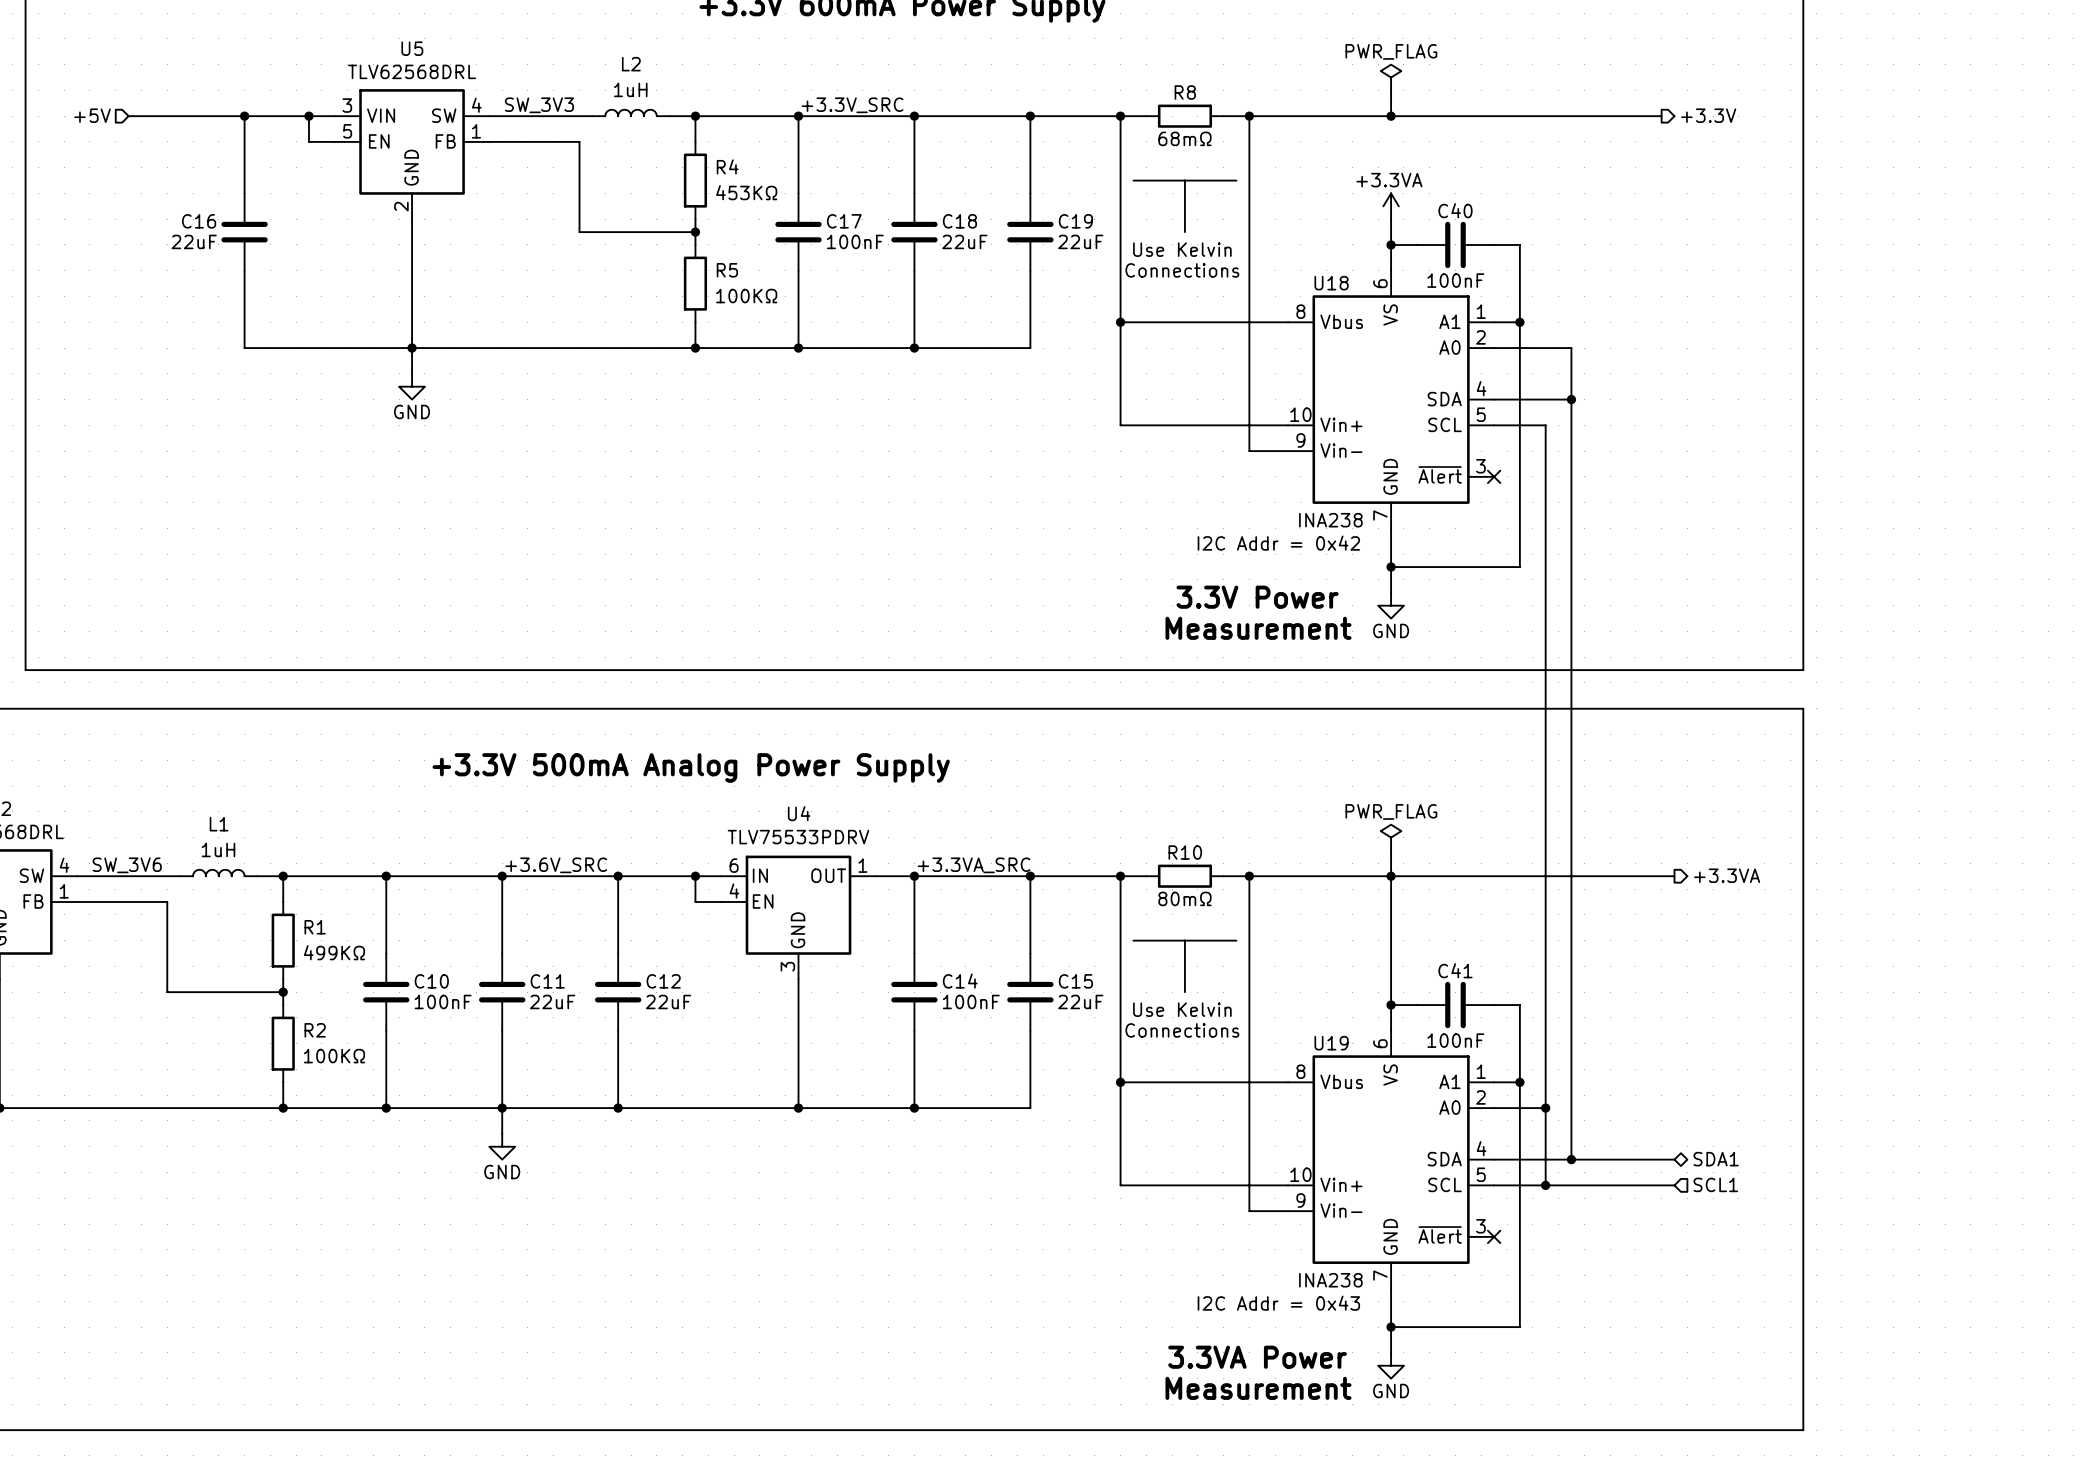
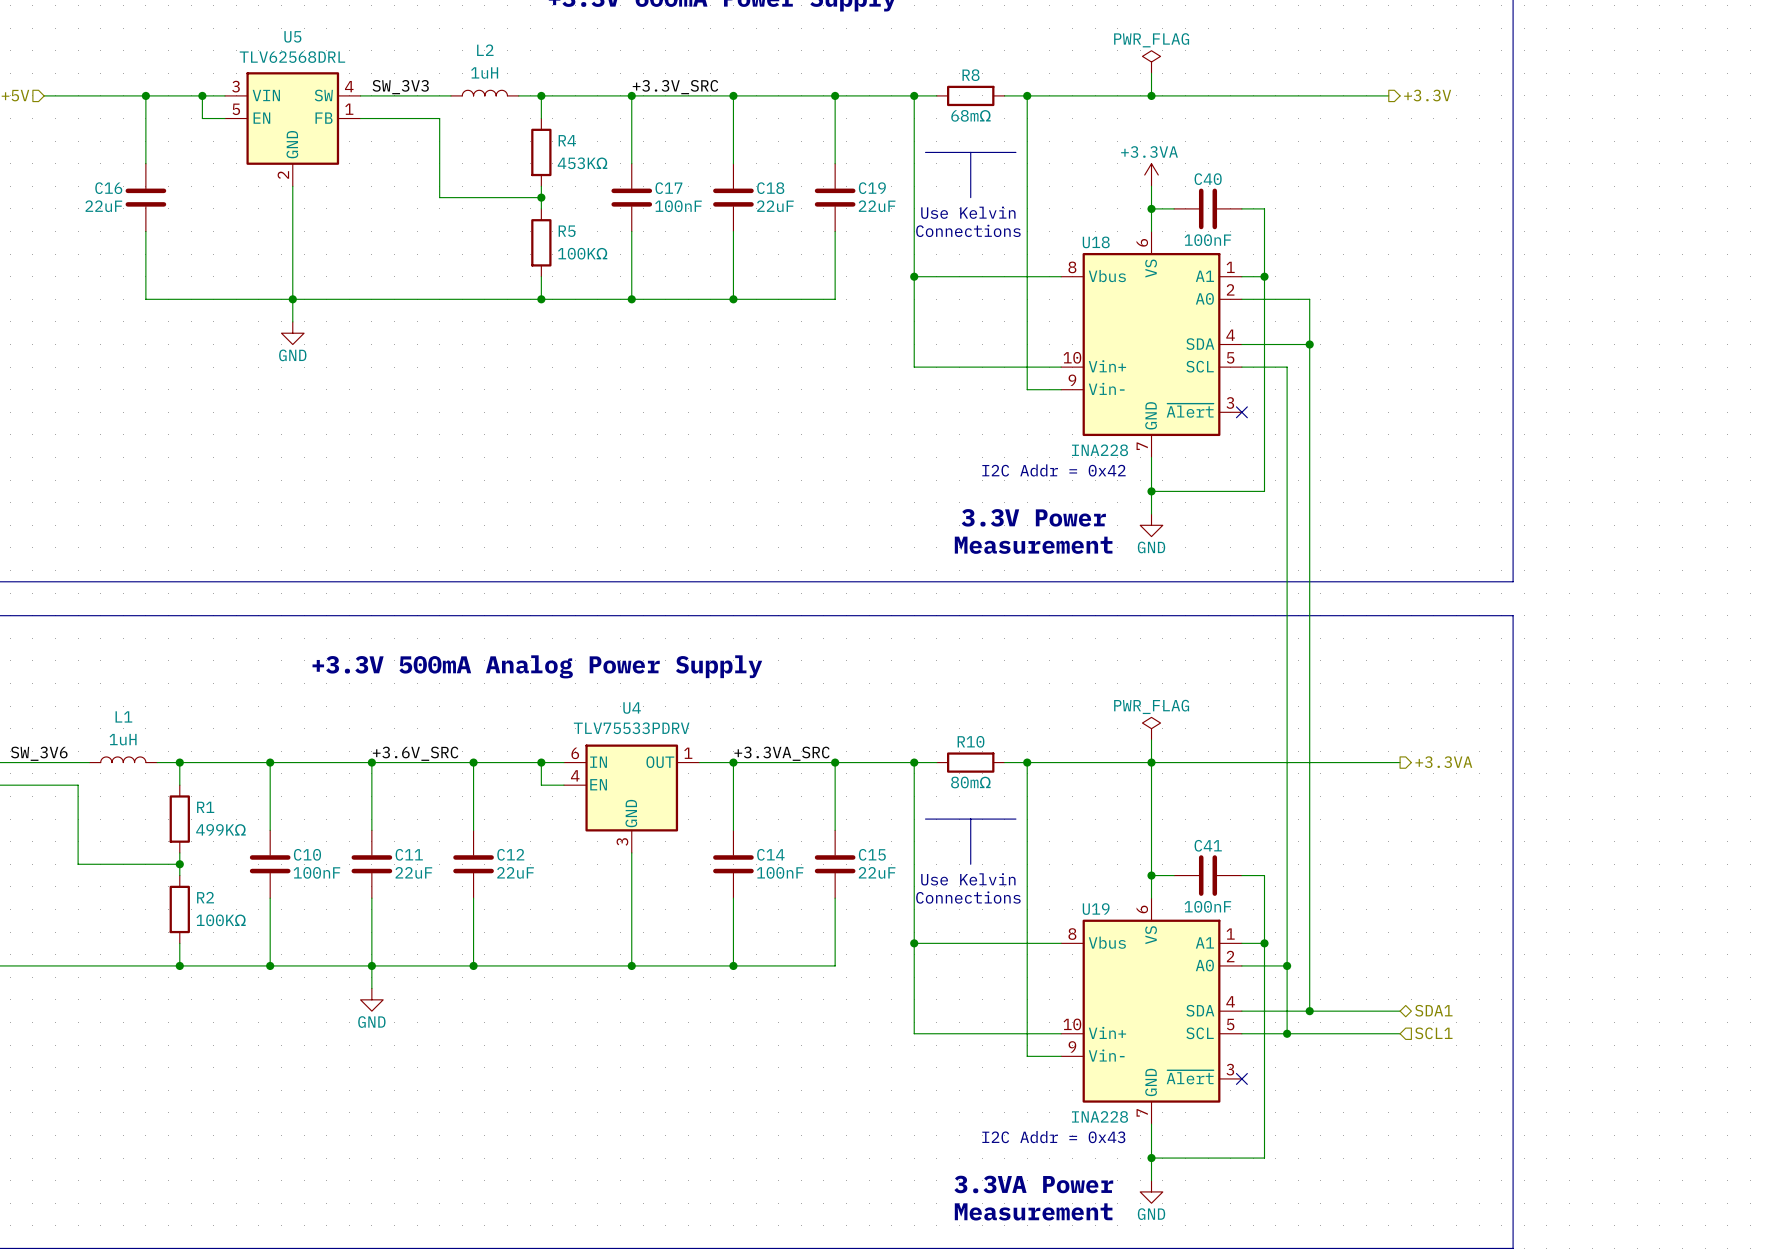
U18 value: INA238 (1330, 520) -> INA228 (1100, 450)
U19 value: INA238 (1330, 1280) -> INA228 (1100, 1116)

